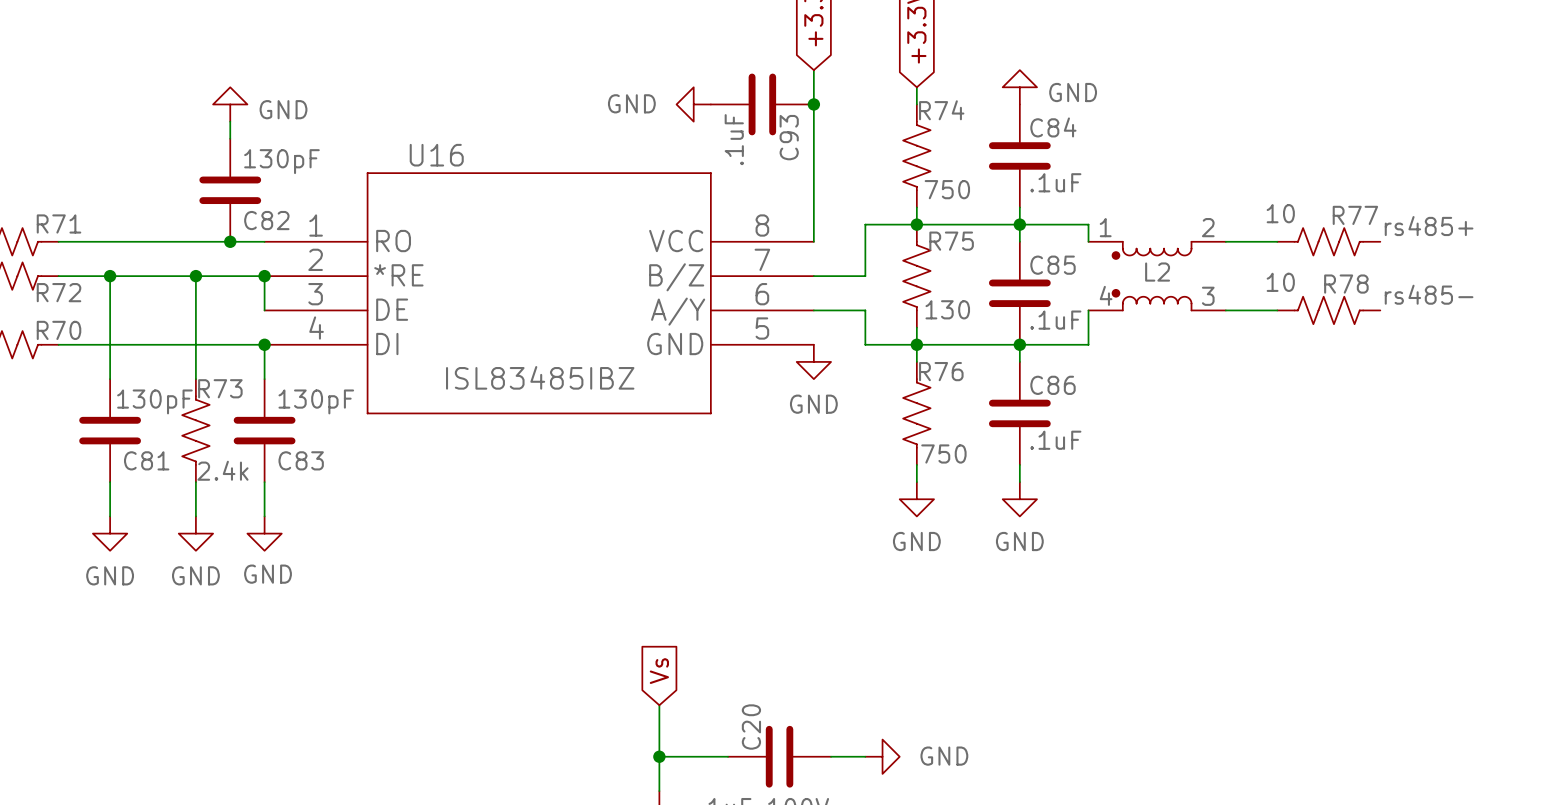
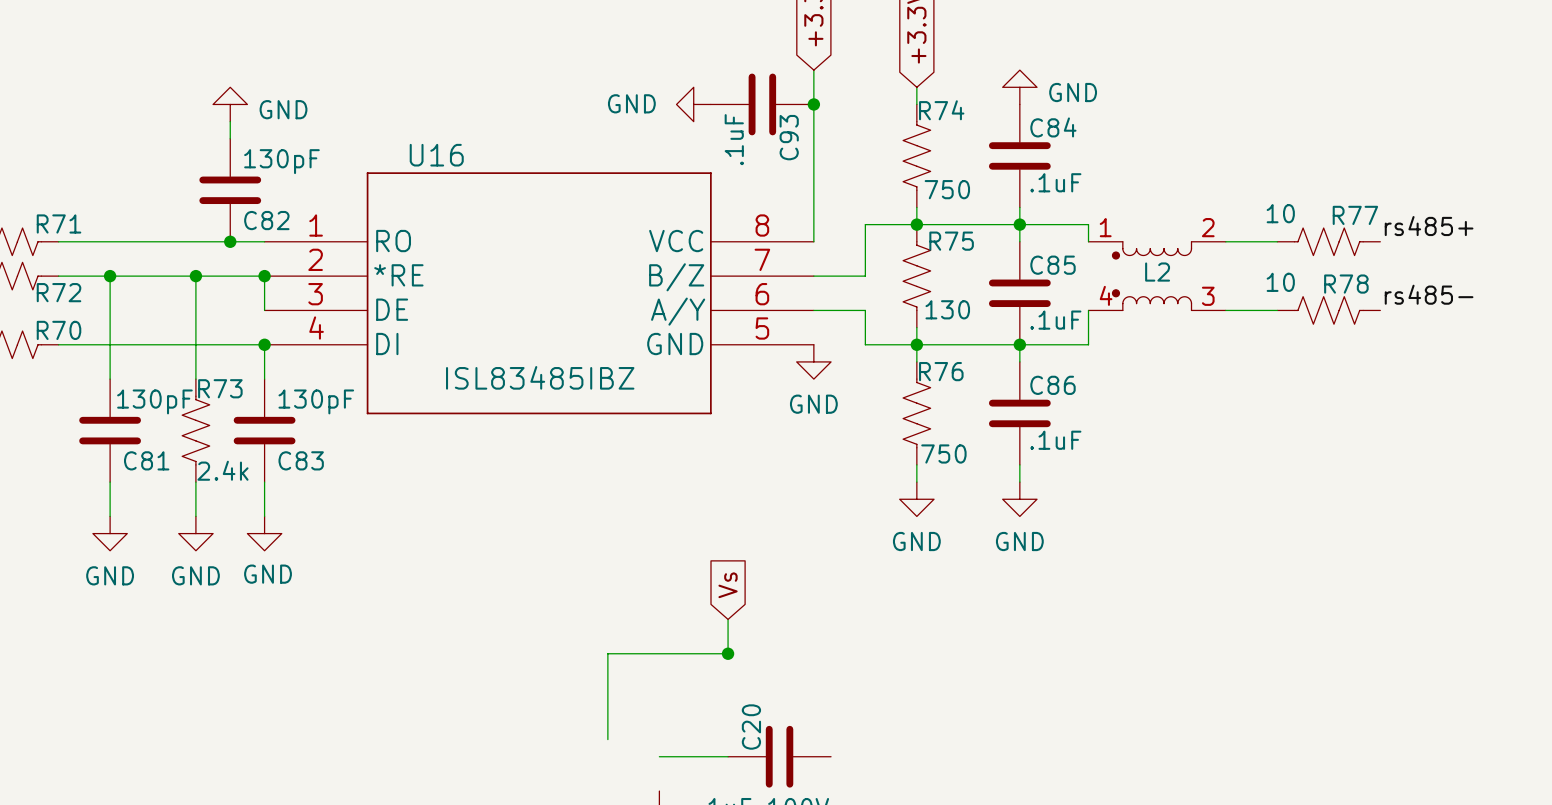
wire: none -> (728, 619) (728, 653) (607, 653) (607, 739)
junction: none -> (728, 653)
global label position: Vs (659, 671) -> Vs (728, 585)
wire: (659, 705) (659, 791) -> none
junction: (659, 756) -> none
wire: (831, 756) (865, 756) -> none
power symbol: GND (882, 756) -> none

